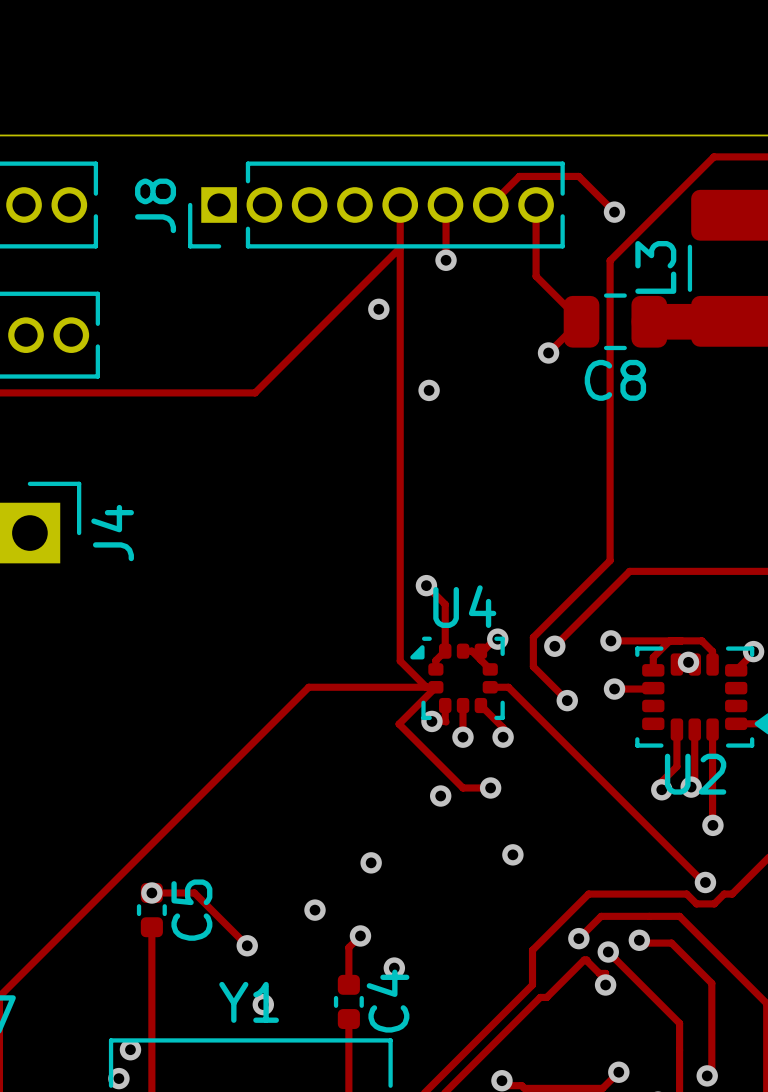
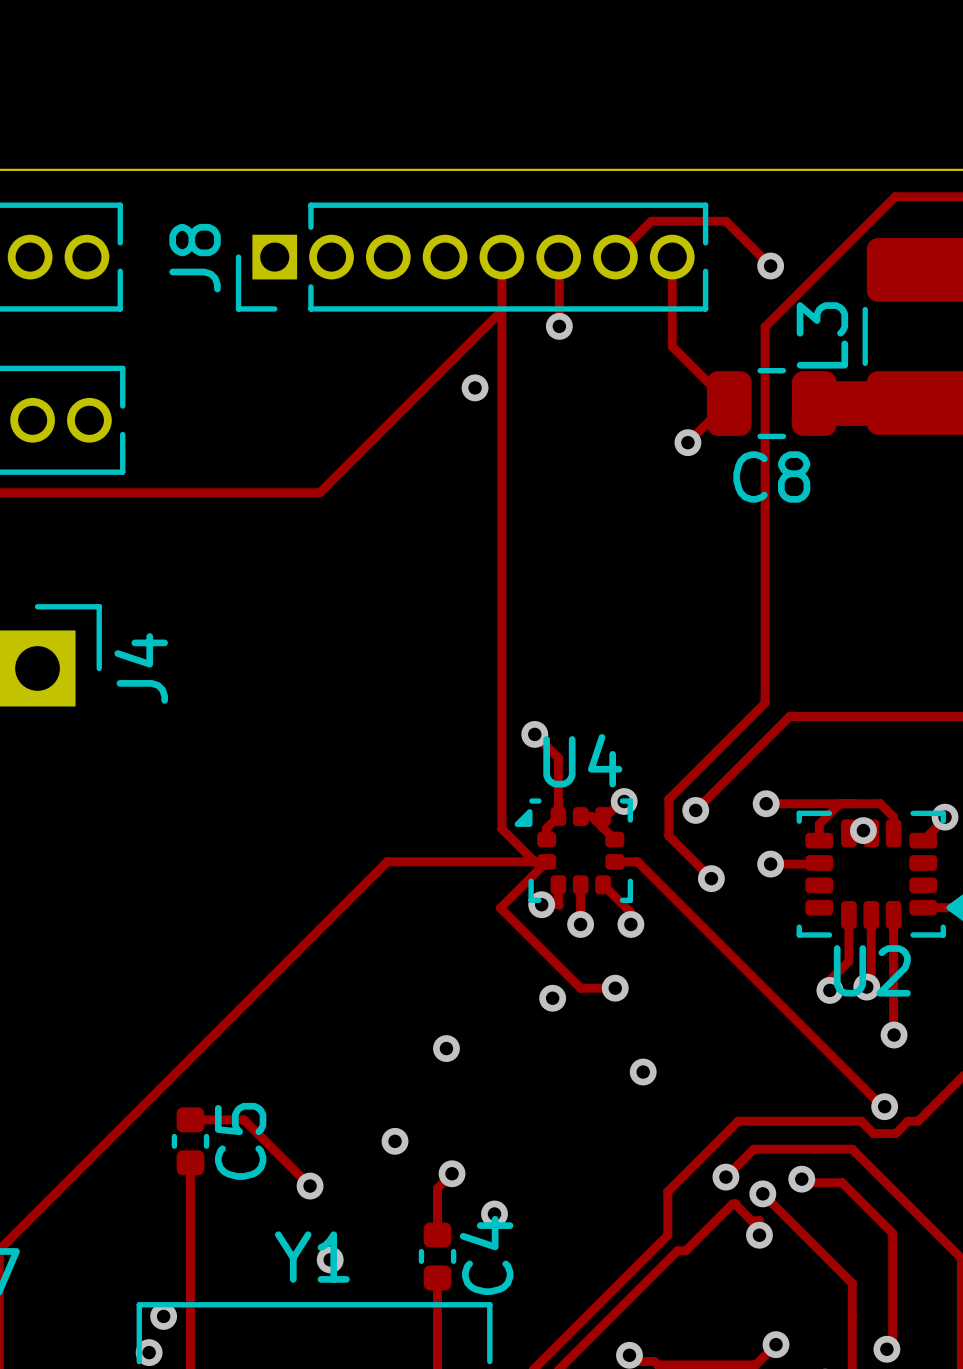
via: (429, 390) -> none
via position: (371, 862) -> (446, 1048)
via: (151, 892) -> none

